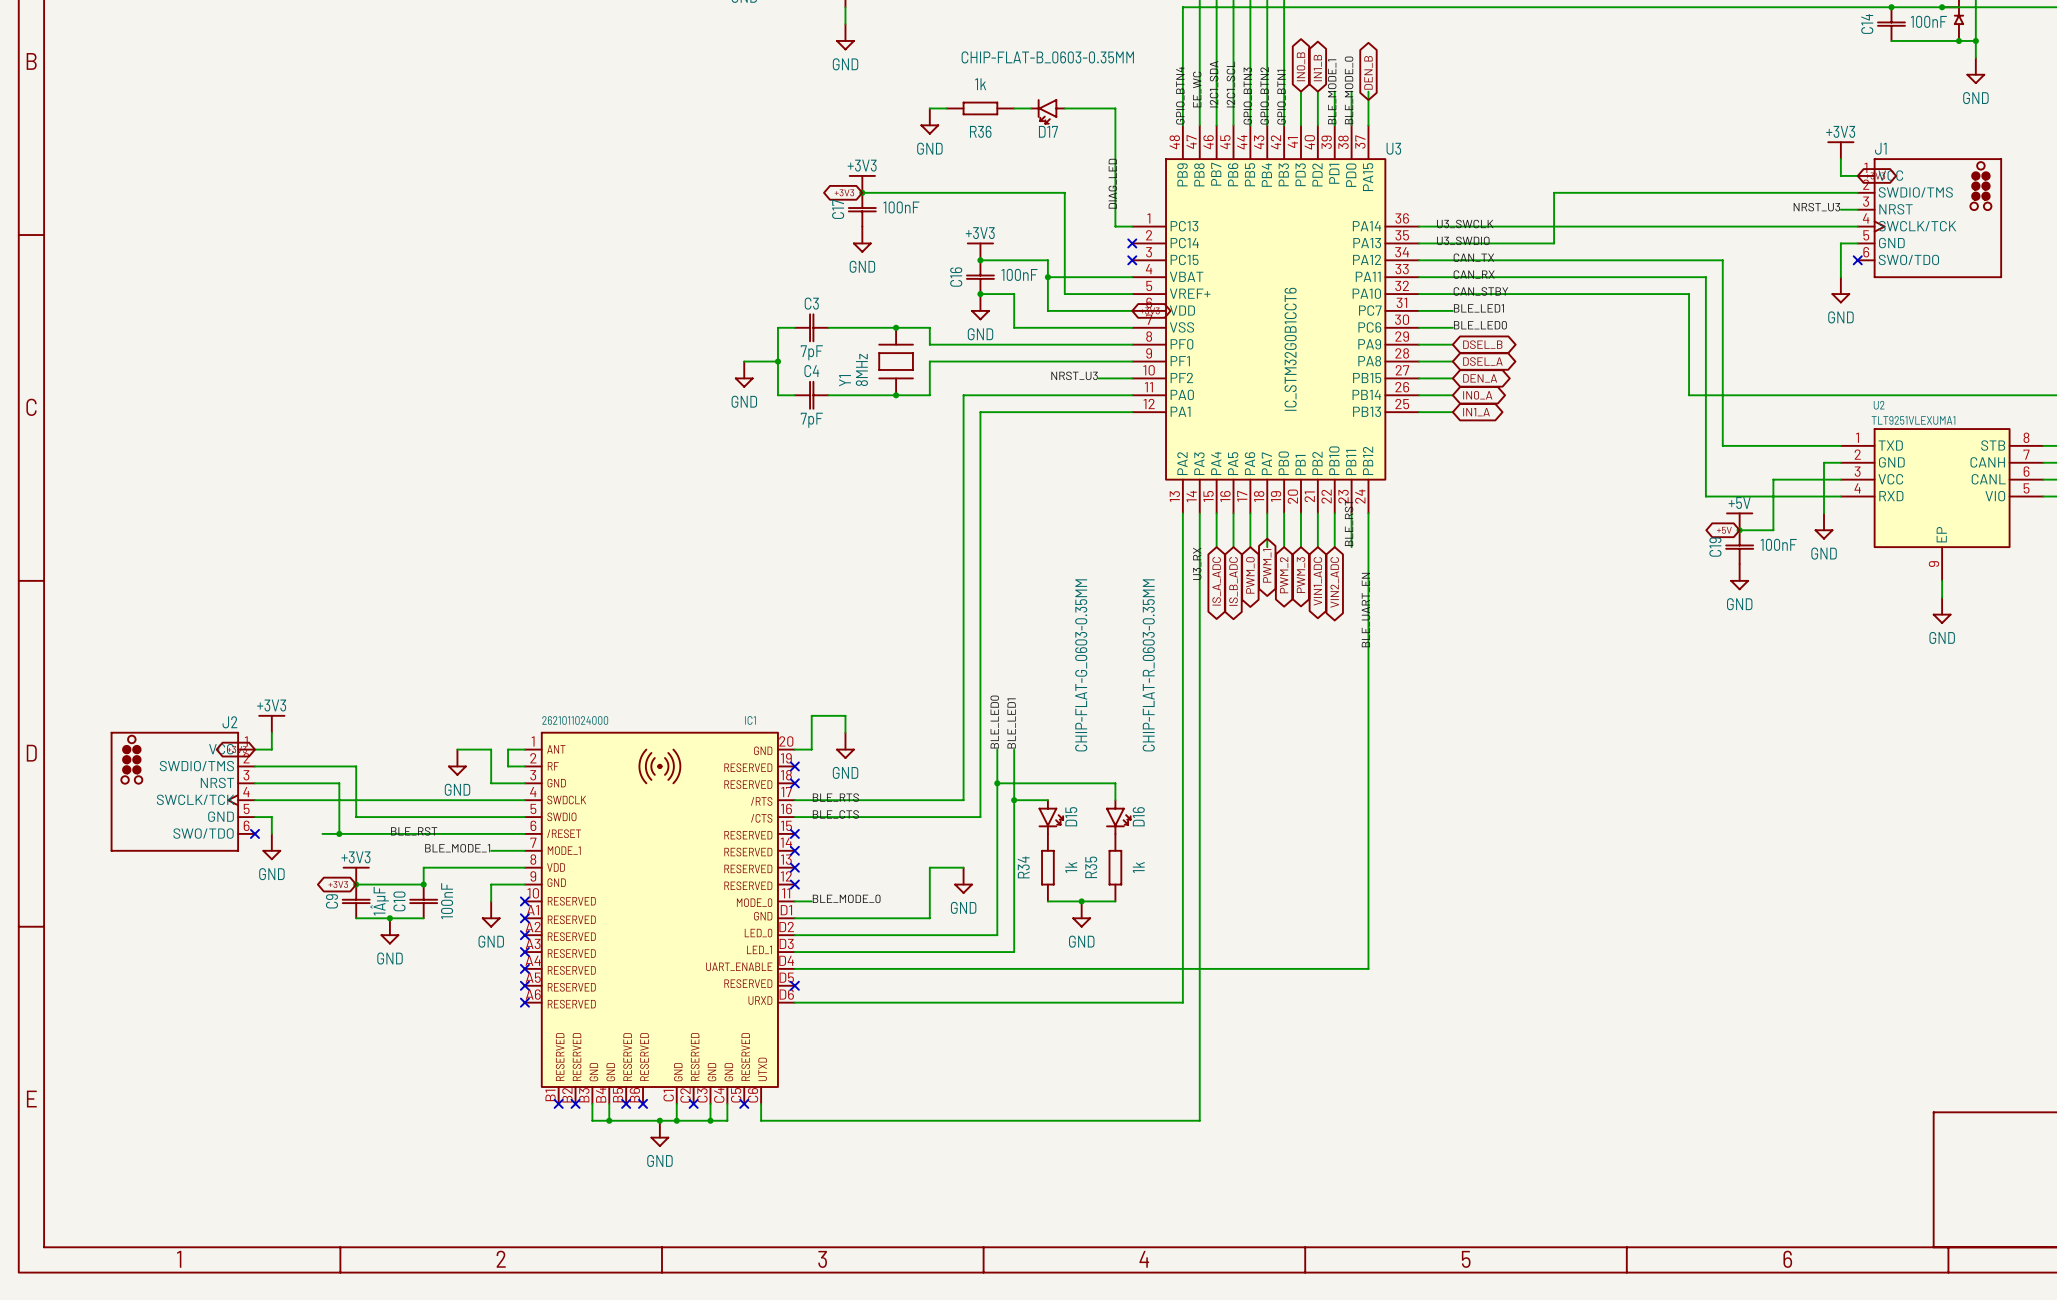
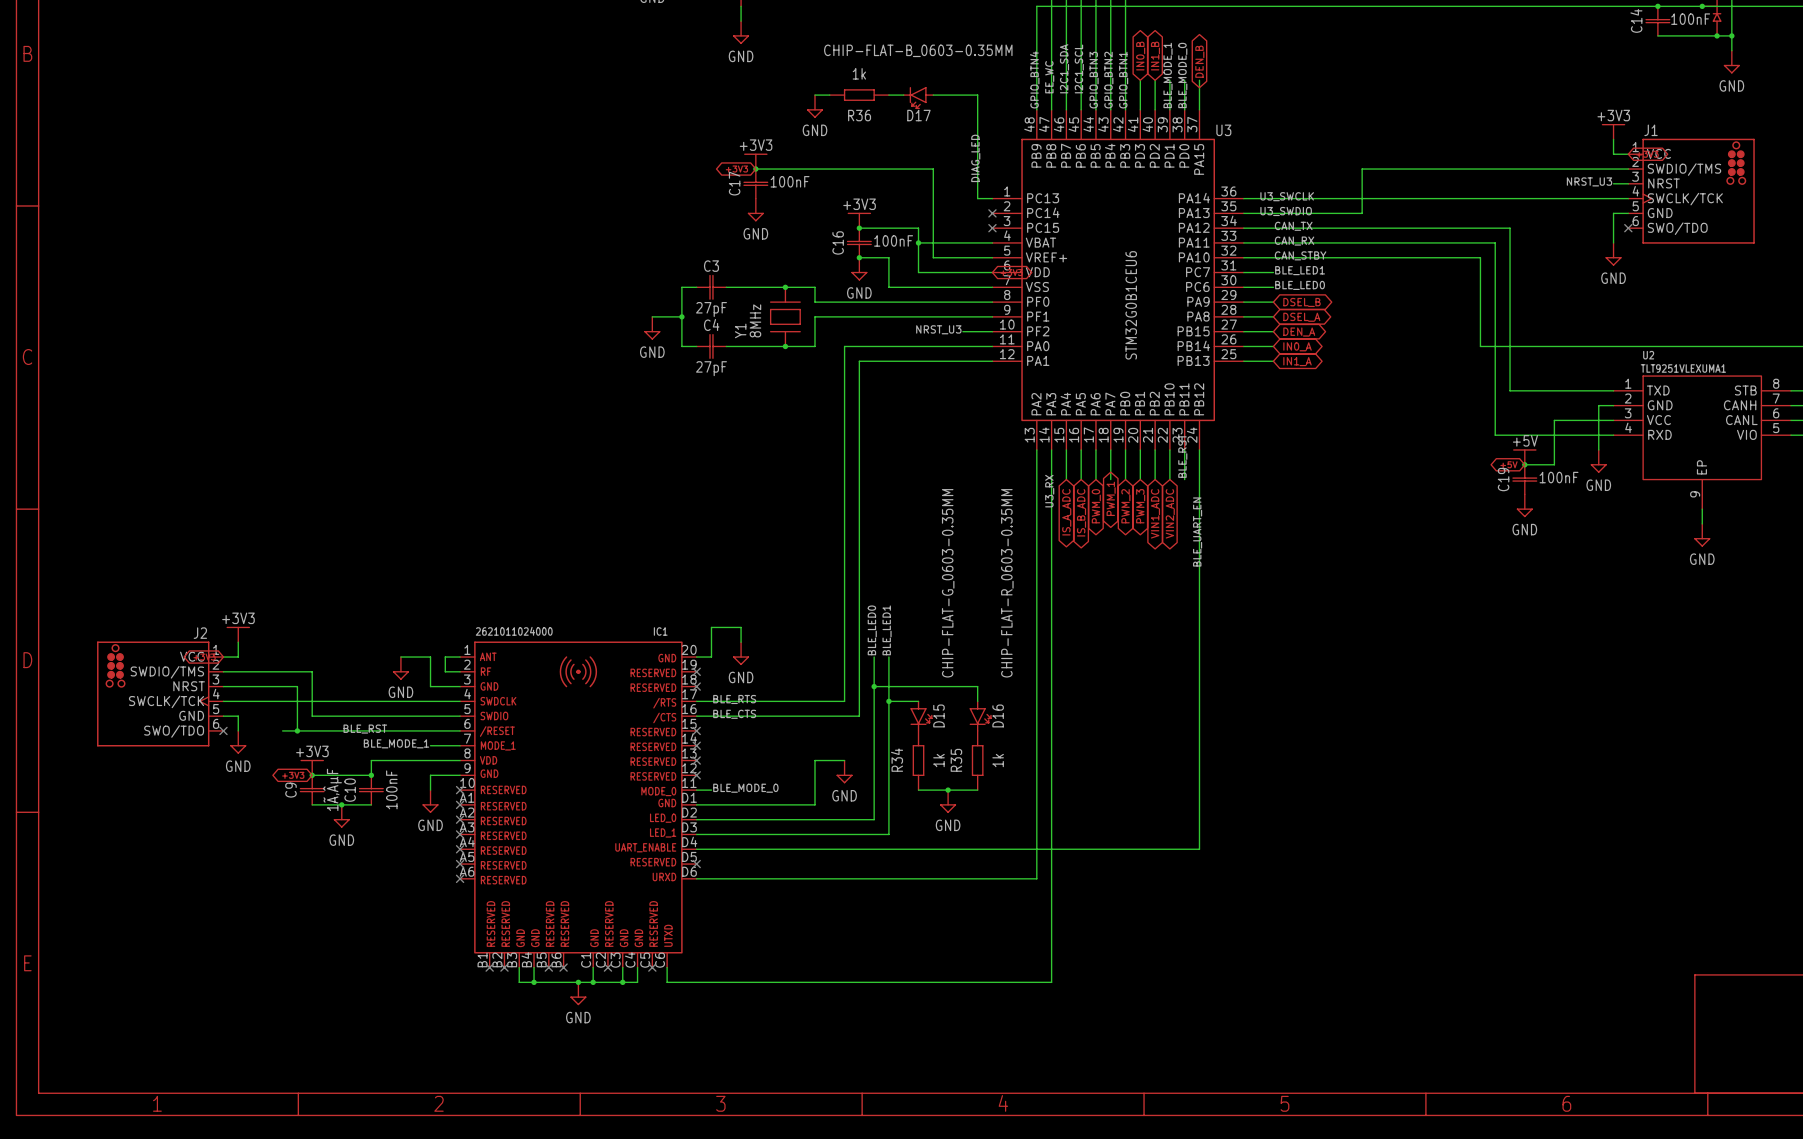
U3 value: IC_STM32G0B1CCT6 (1290, 349) -> STM32G0B1CEU6 (1131, 305)
C3 value: 7pF (811, 352) -> 27pF (711, 309)
C4 value: 7pF (811, 420) -> 27pF (711, 368)
C9 value: 1ÂµF (379, 901) -> 1Ã‚ÂµF (332, 789)

